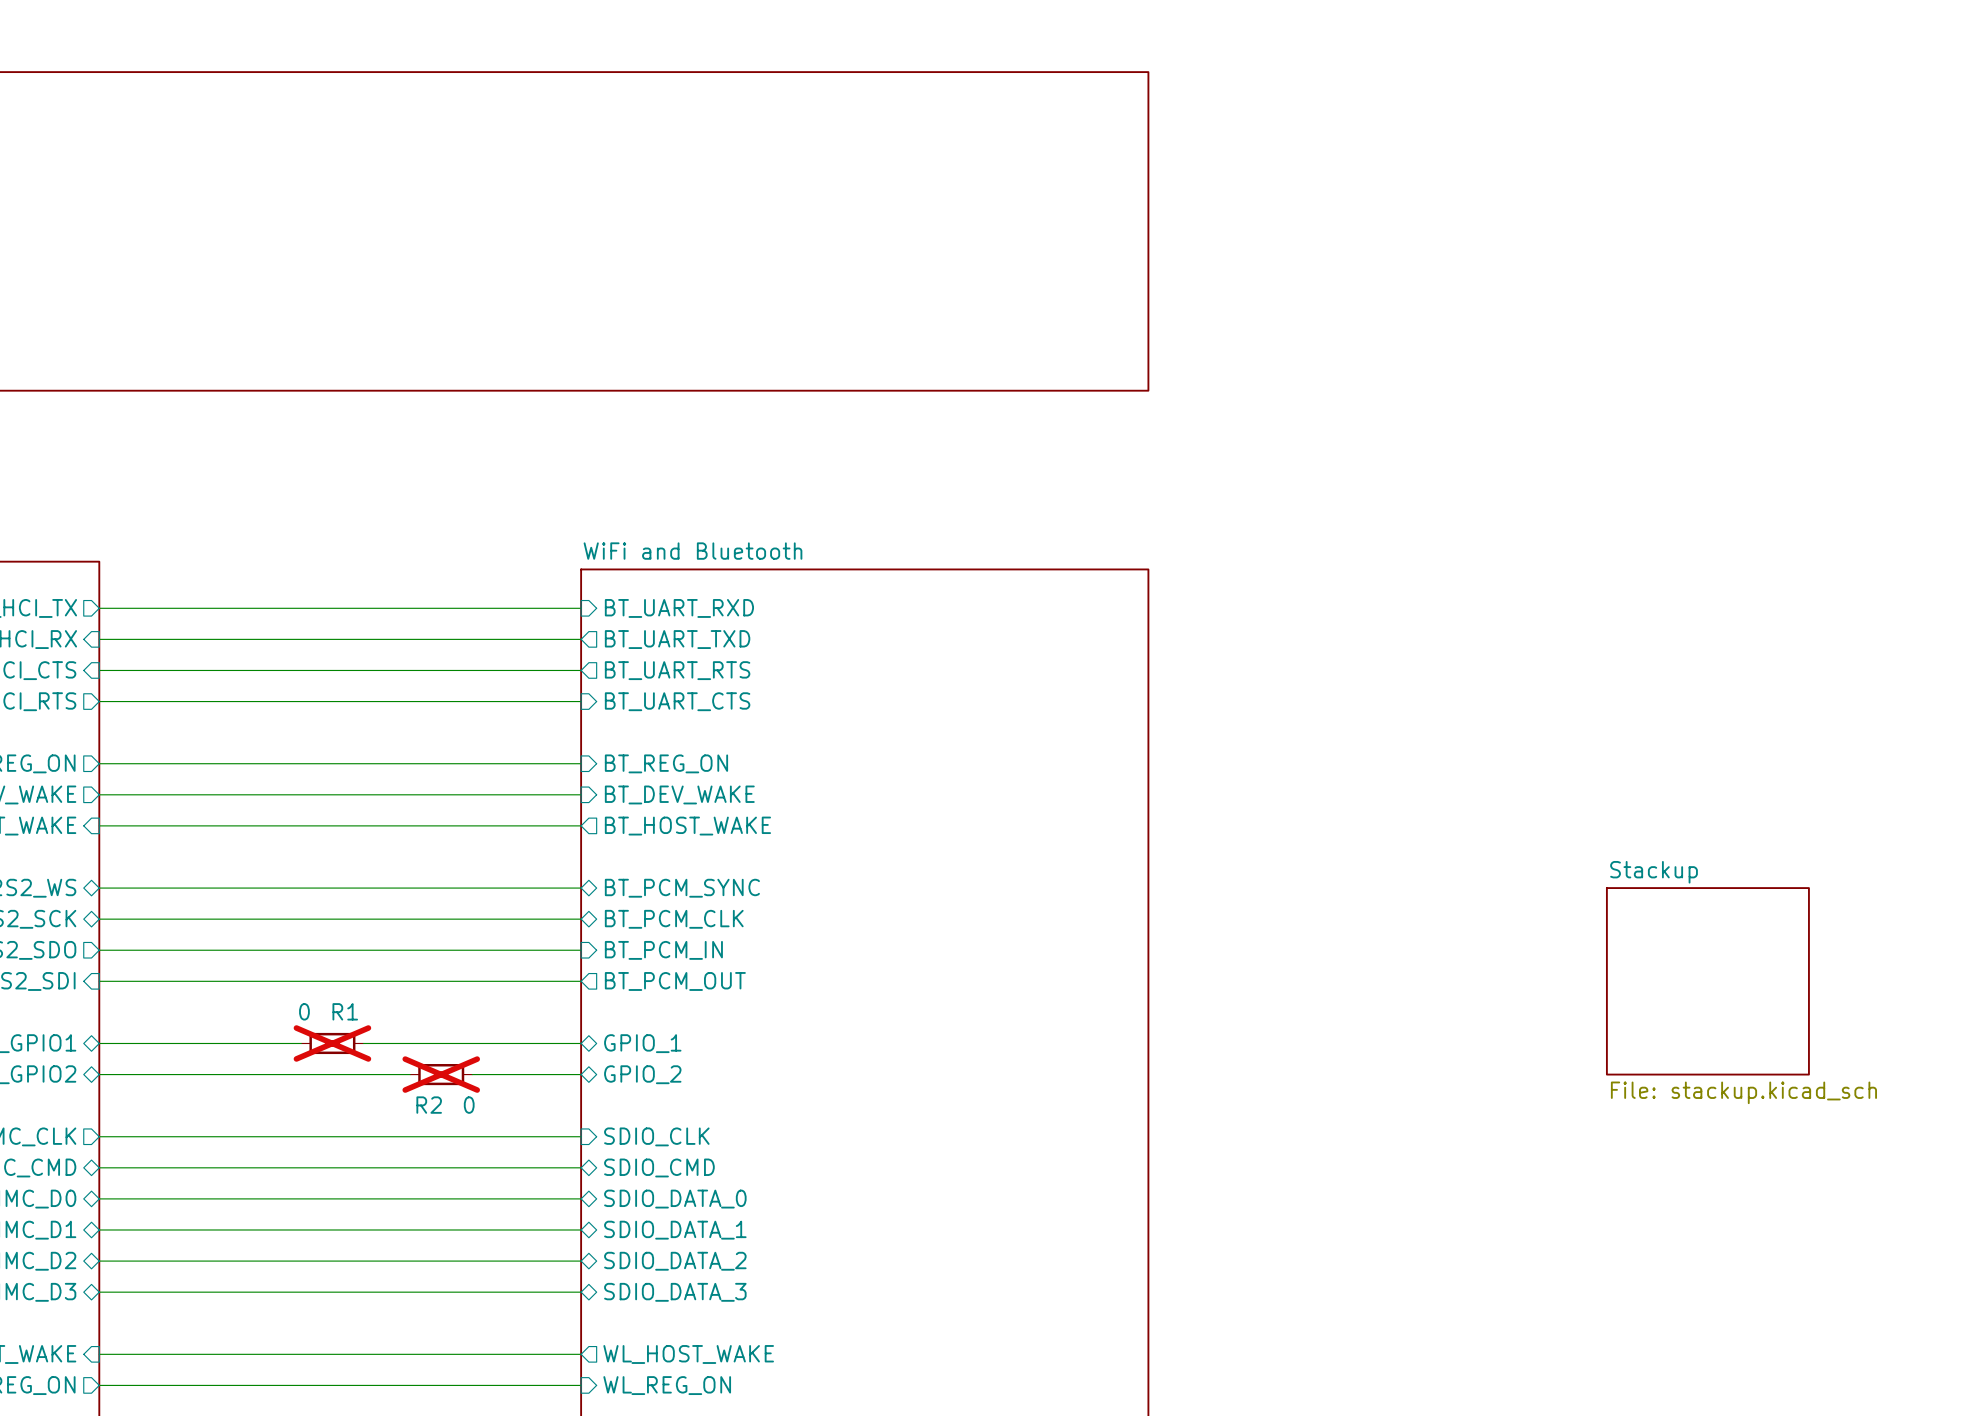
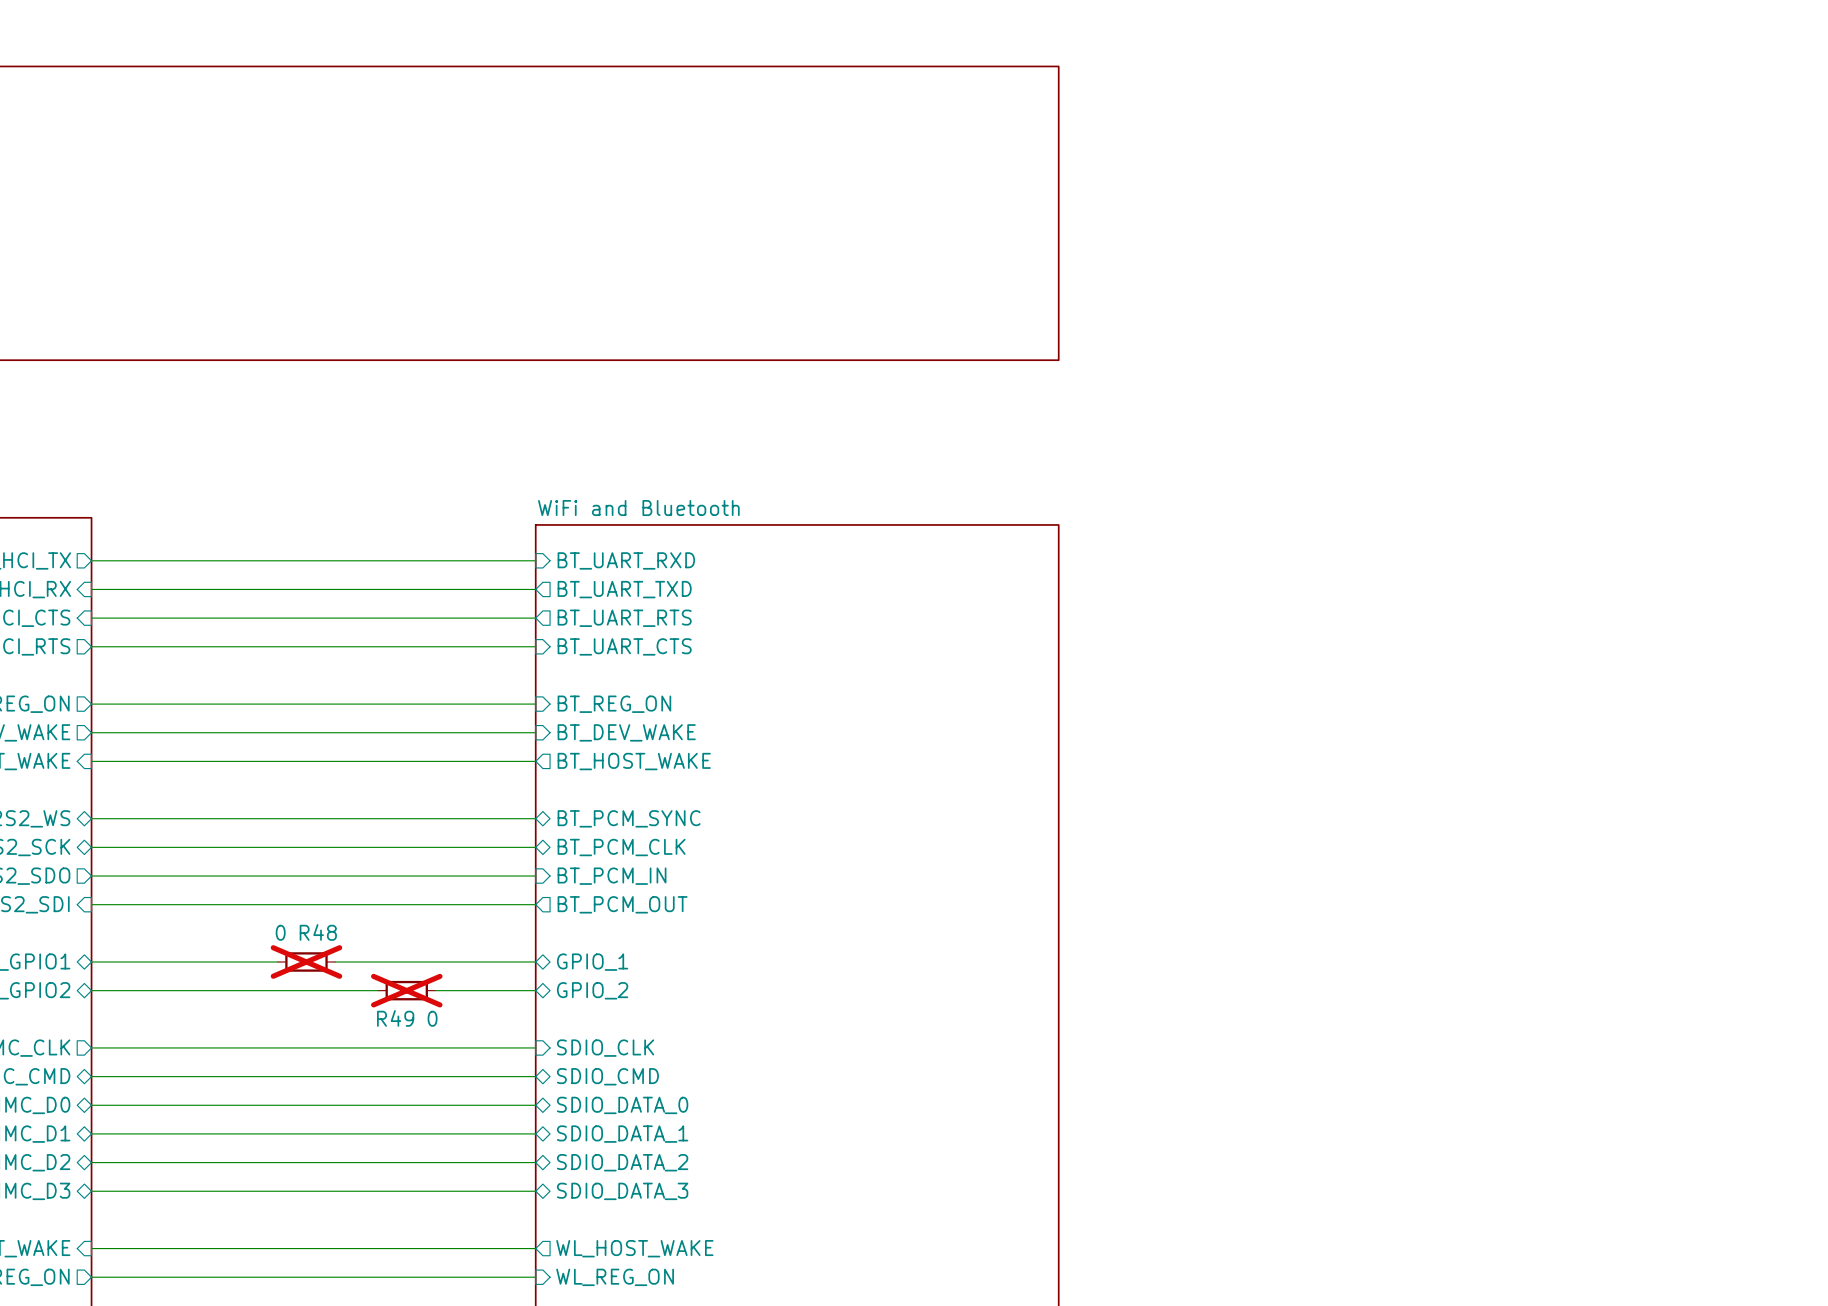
sheet Stackup: File: stackup.kicad_sch (1707, 981) -> none
R1 name: R1 (345, 1011) -> R48 (318, 932)
R2 name: R2 (429, 1105) -> R49 (395, 1018)

